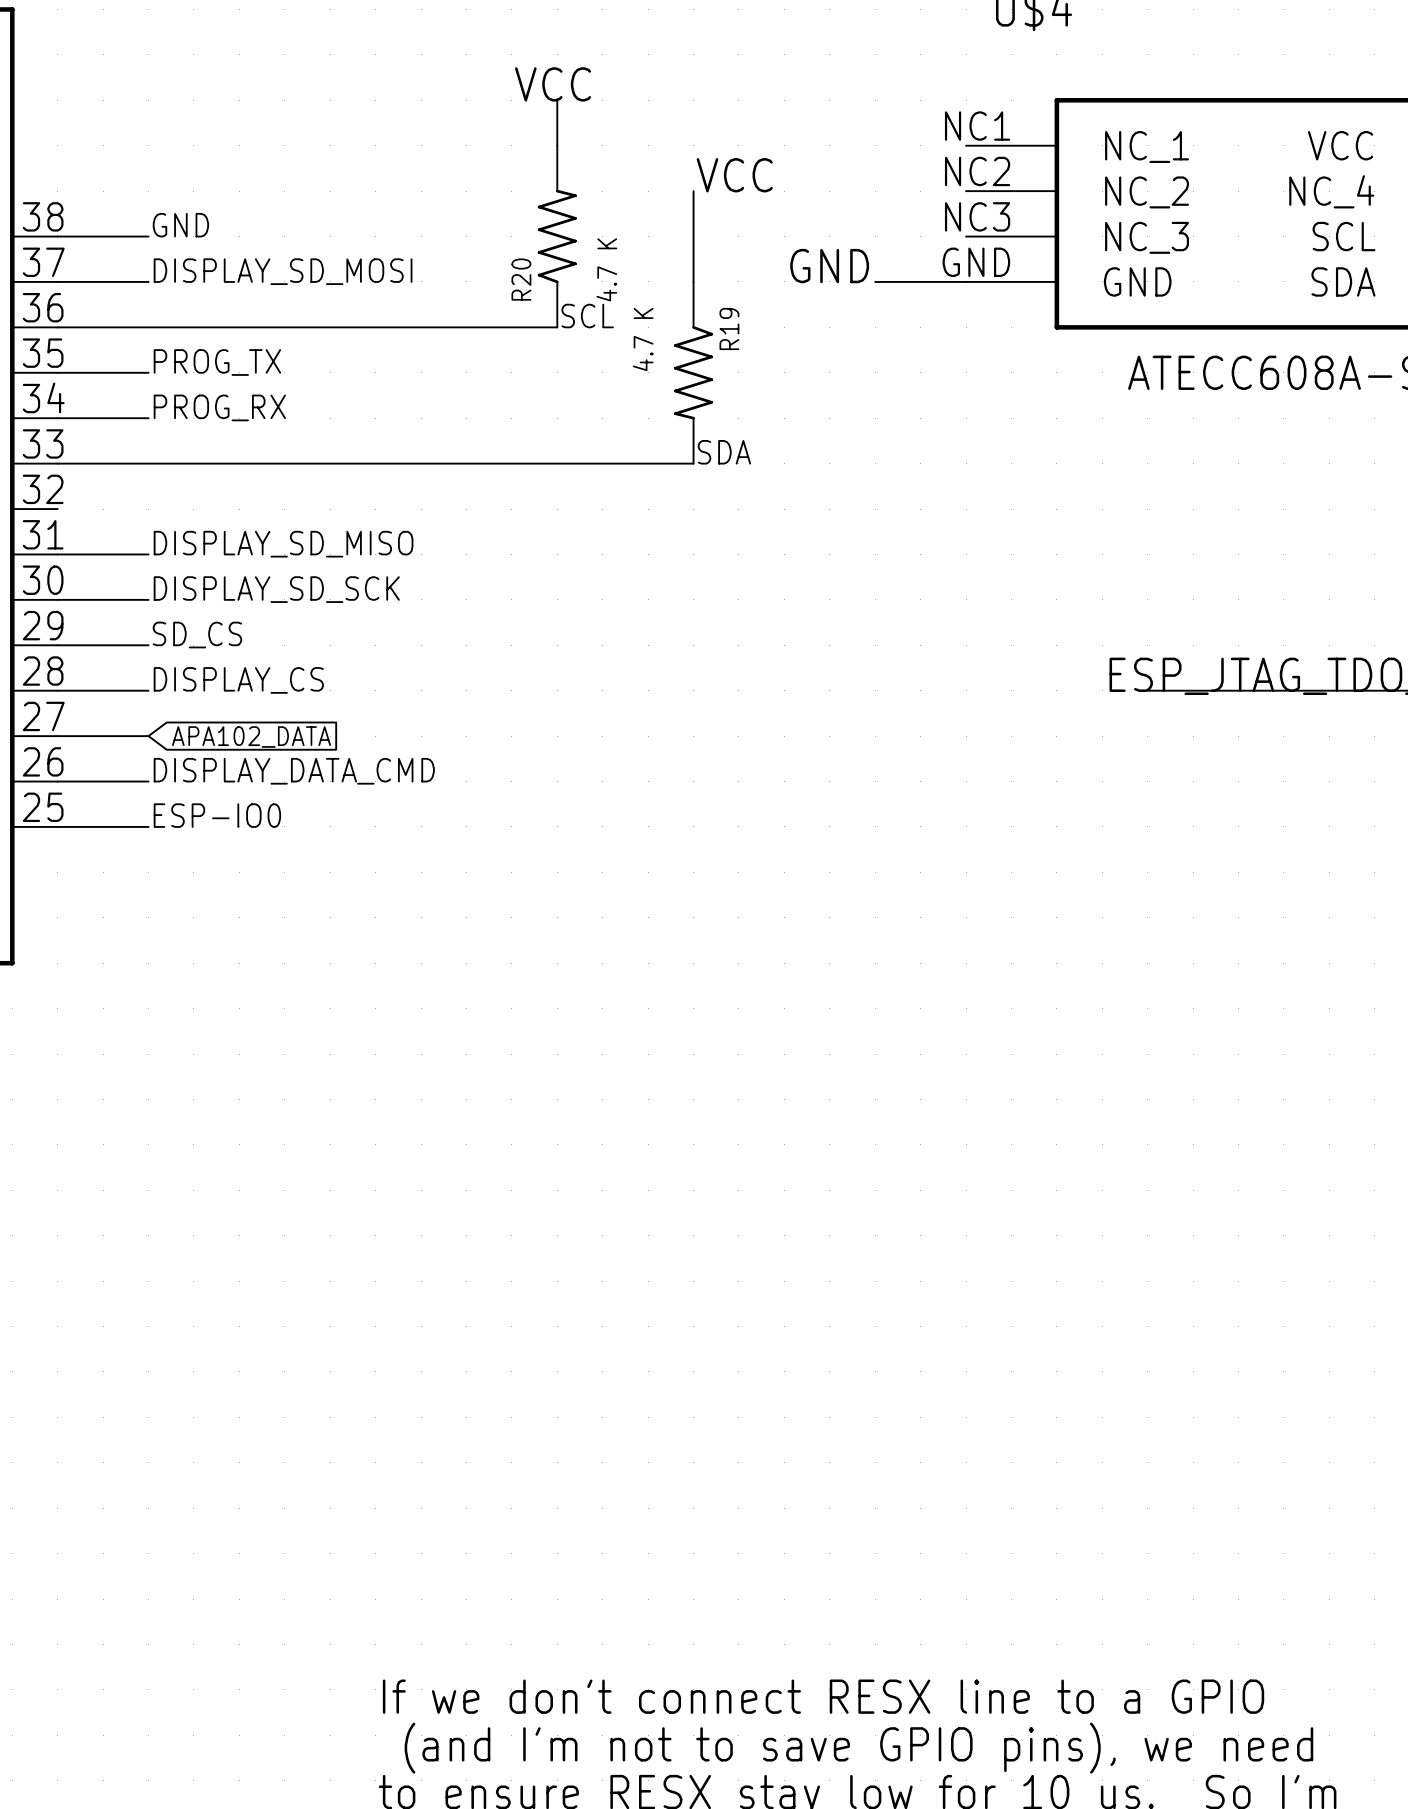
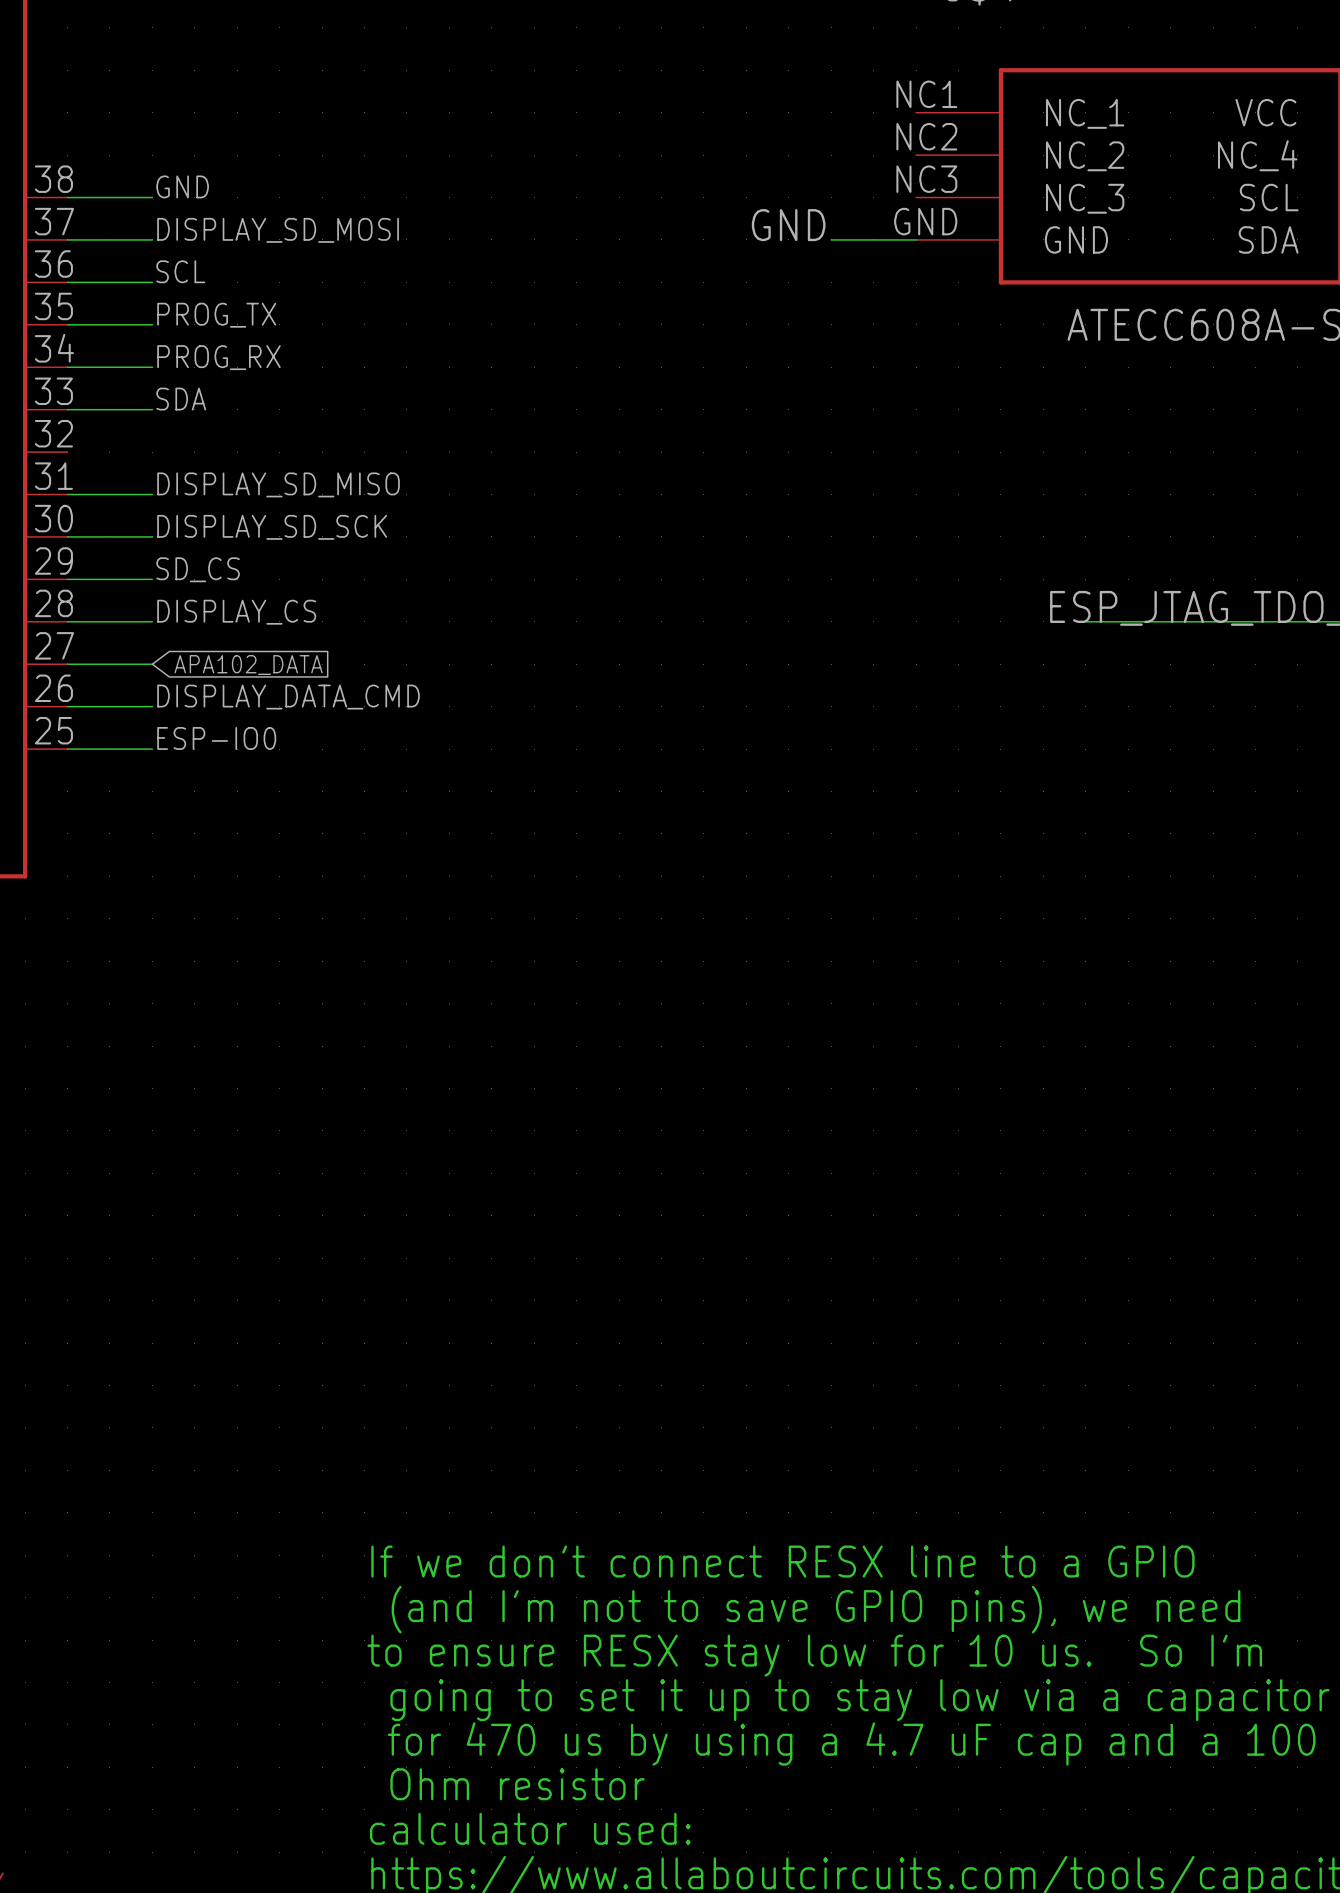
label: VCC (553, 84) -> none
wire: (557, 100) (557, 145) -> none
label: VCC (734, 175) -> none
wire: (693, 191) (693, 281) -> none
R20: 4.7 K (557, 236) -> none
label position: SCL (587, 316) -> SCL (180, 271)
wire: (148, 327) (557, 327) -> none
R19: 4.7 K (693, 372) -> none
label: none -> SDA (181, 399)
label: SDA (724, 452) -> none
wire: (148, 463) (693, 463) -> none

